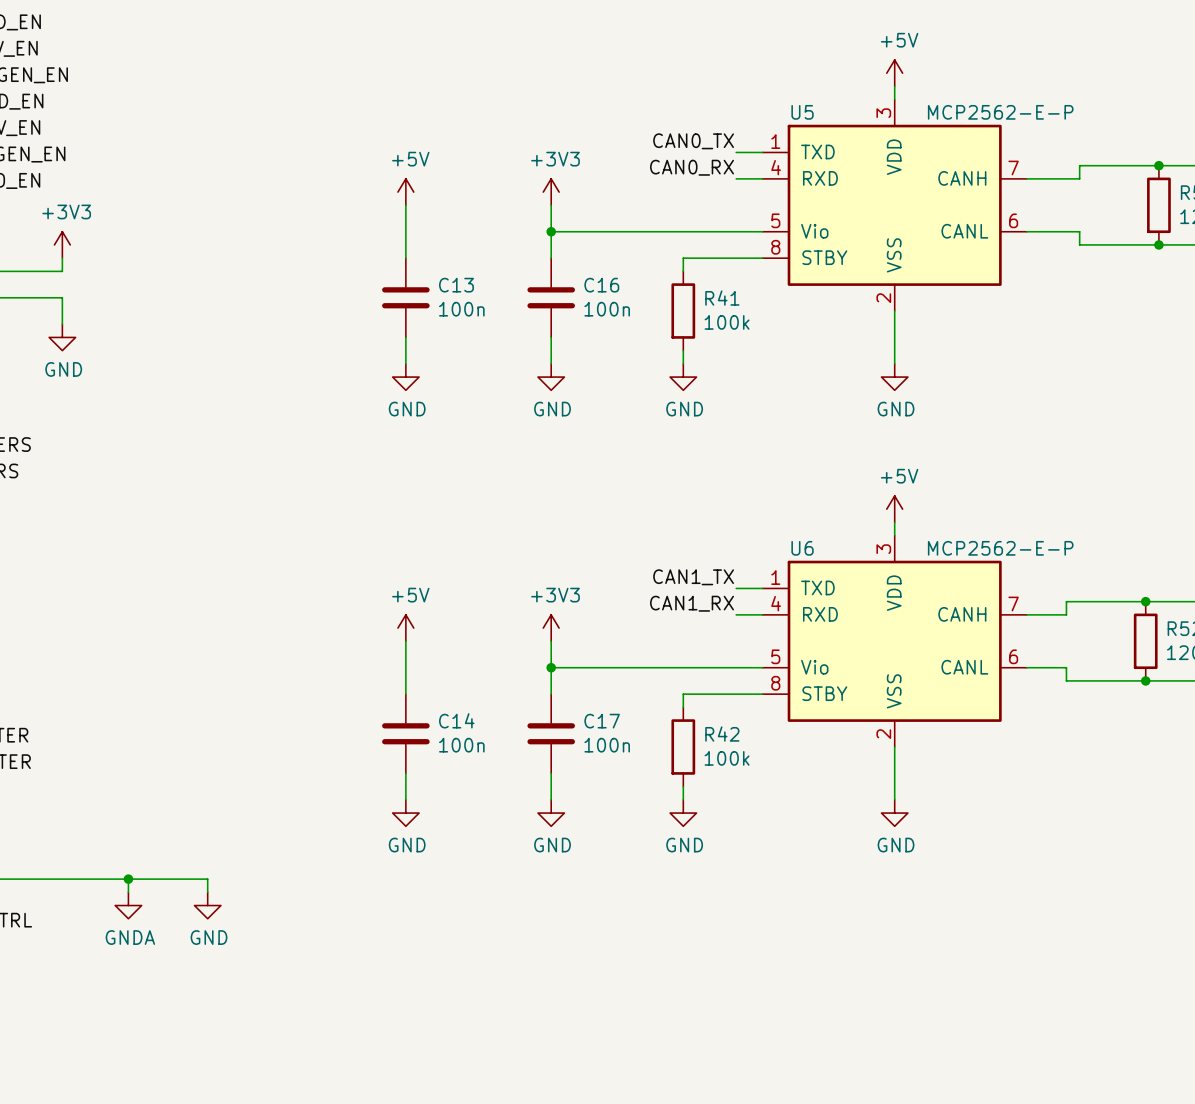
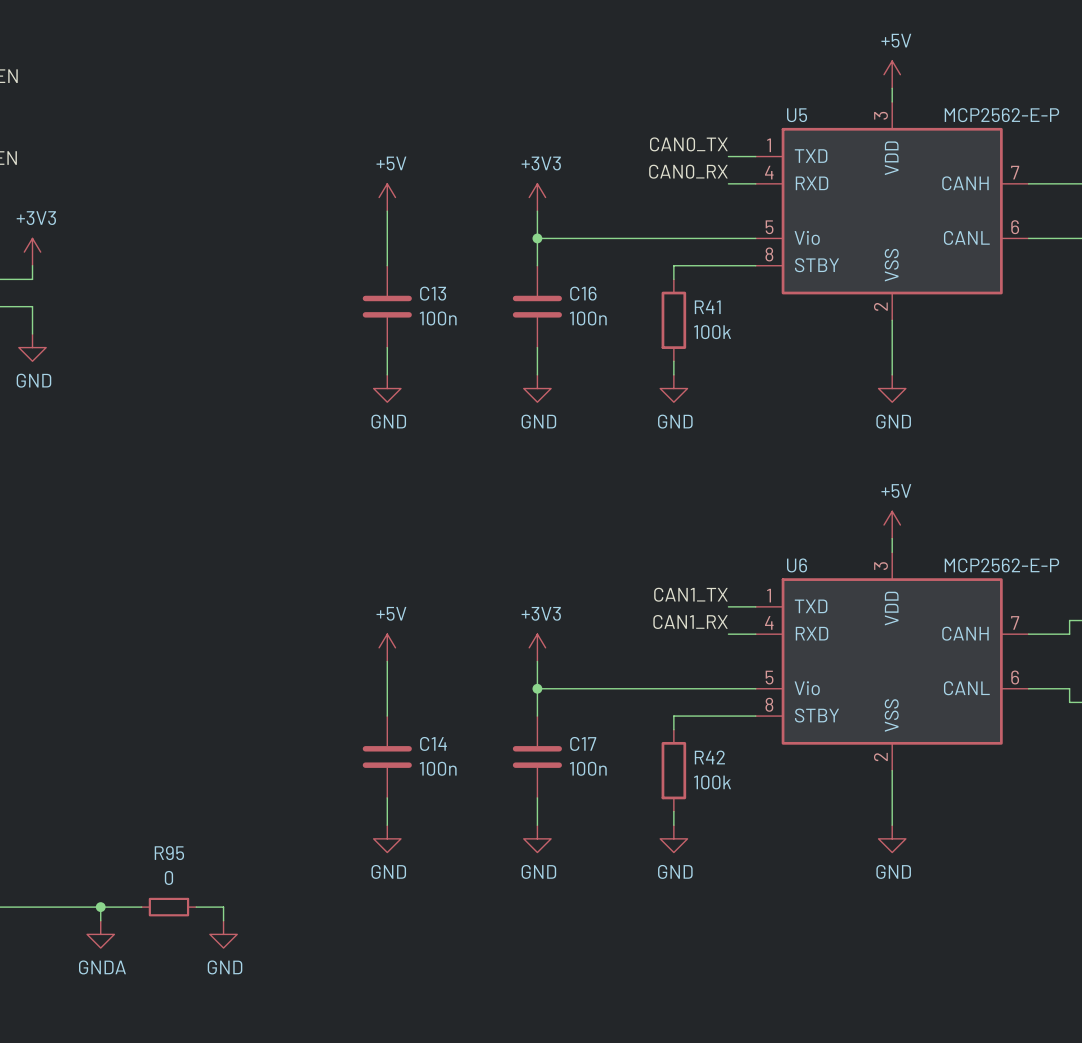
wire: (168, 879) (207, 879) (207, 892) -> none
R95: none -> 0 (168, 907)
wire: none -> (196, 907) (223, 907) (223, 920)
power symbol position: GND (207, 905) -> GND (223, 934)

